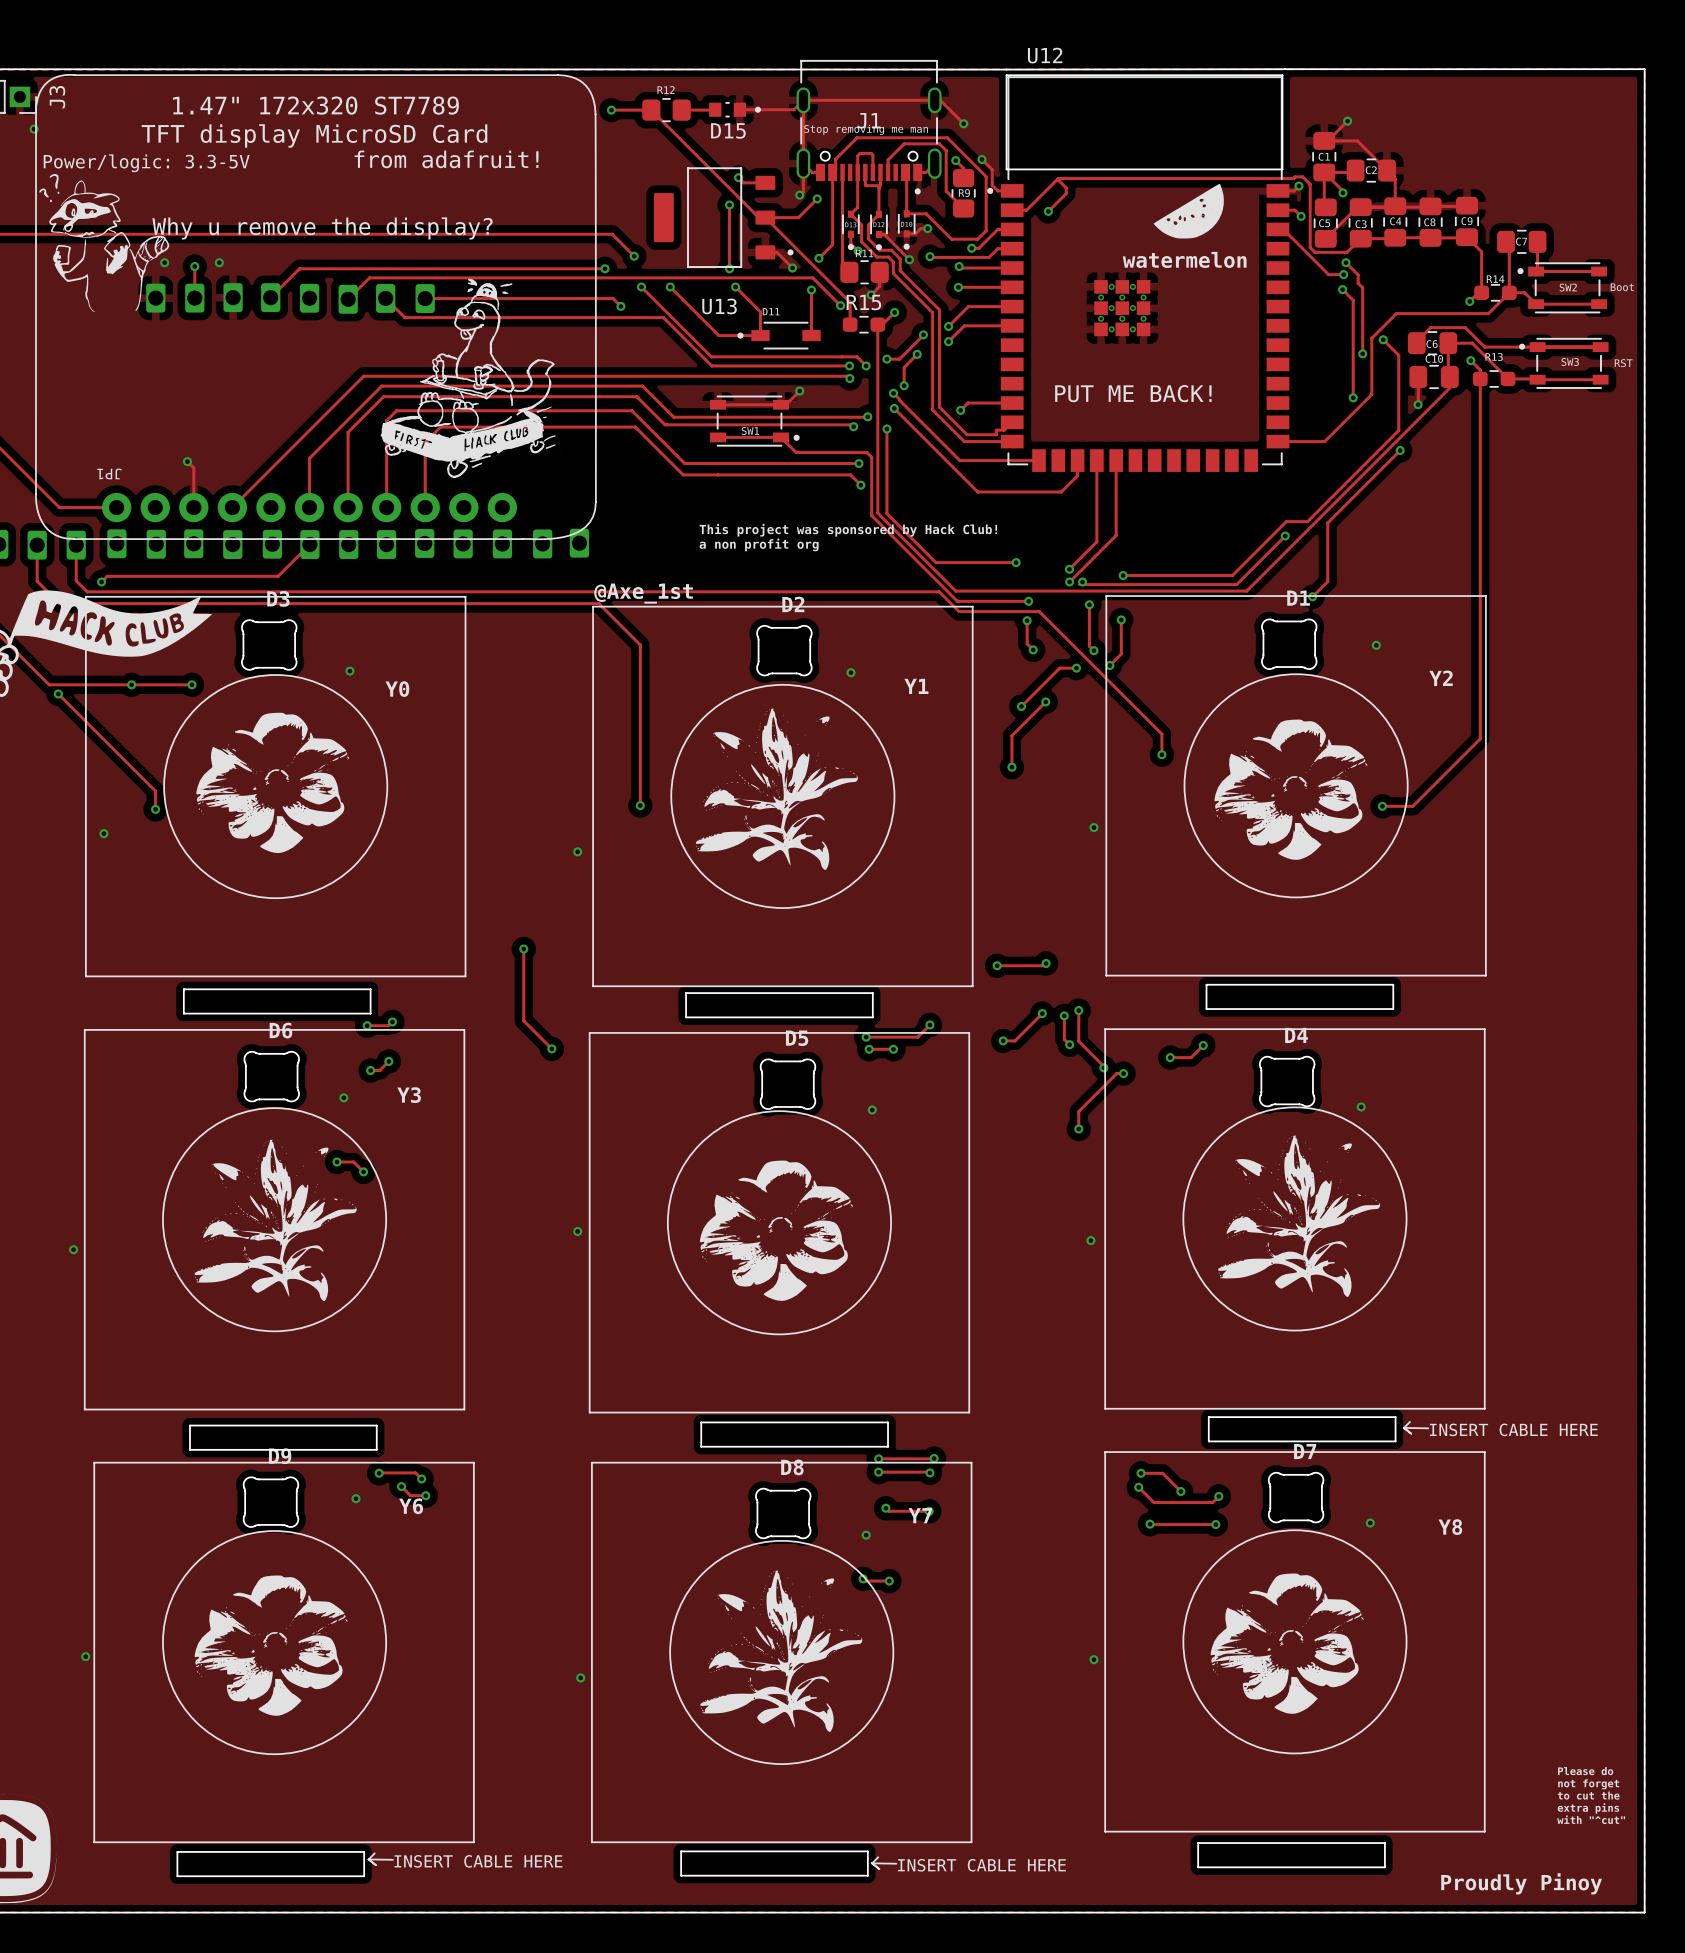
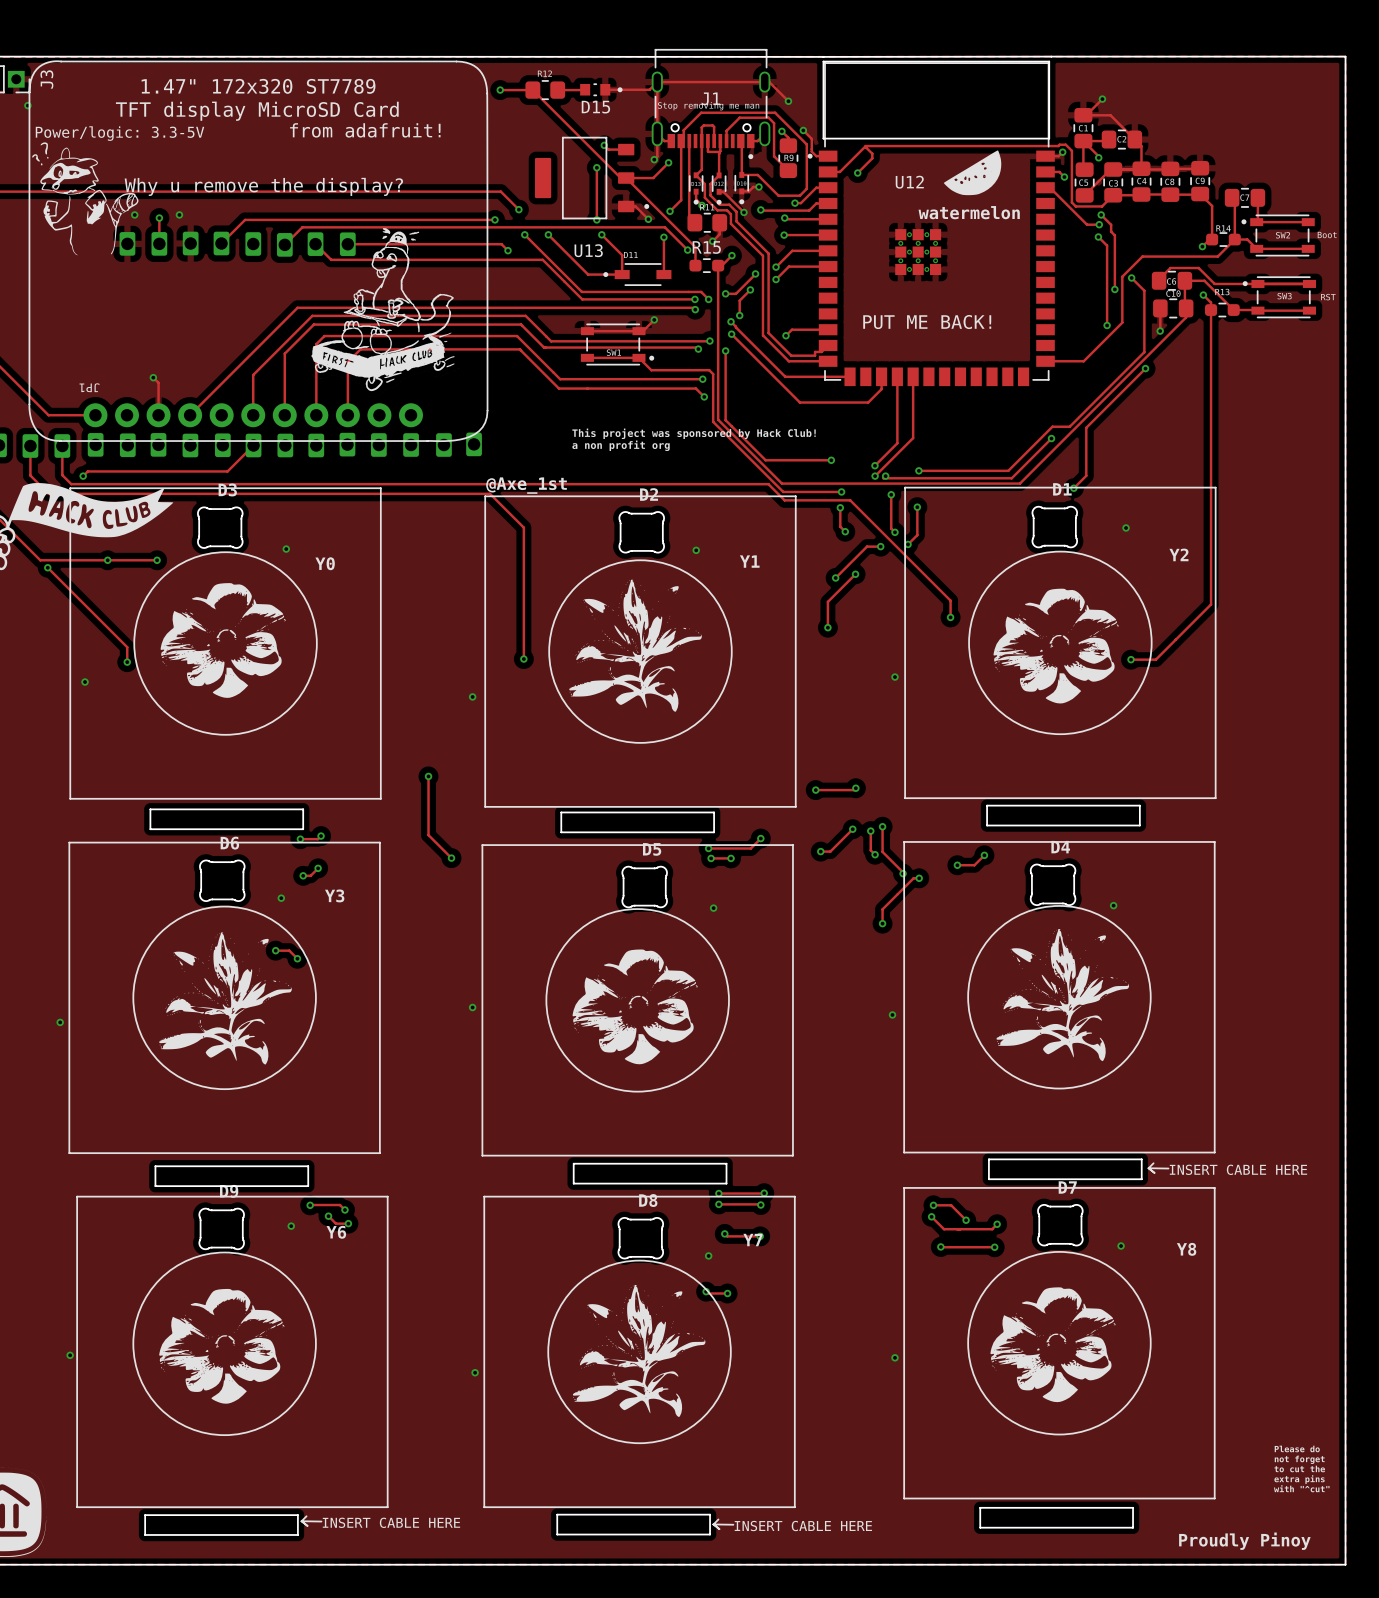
U12 name position: U12 (1045, 55) -> U12 (909, 182)

